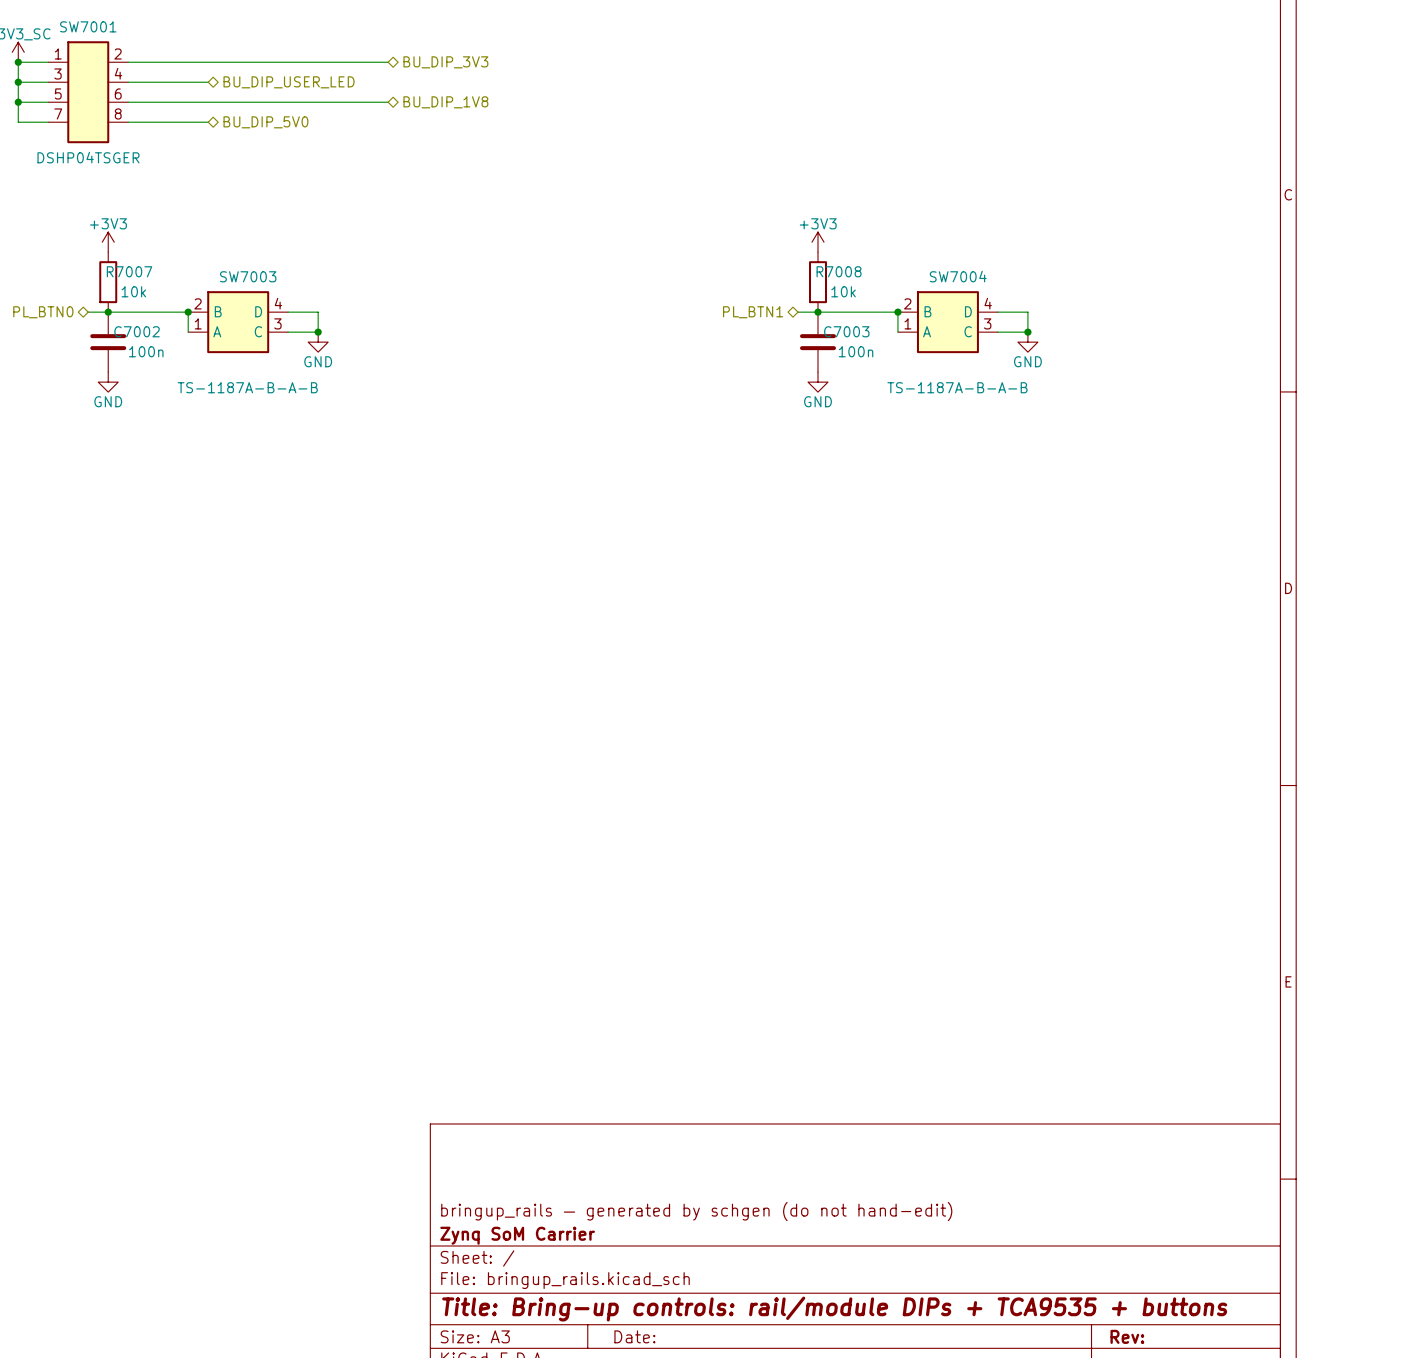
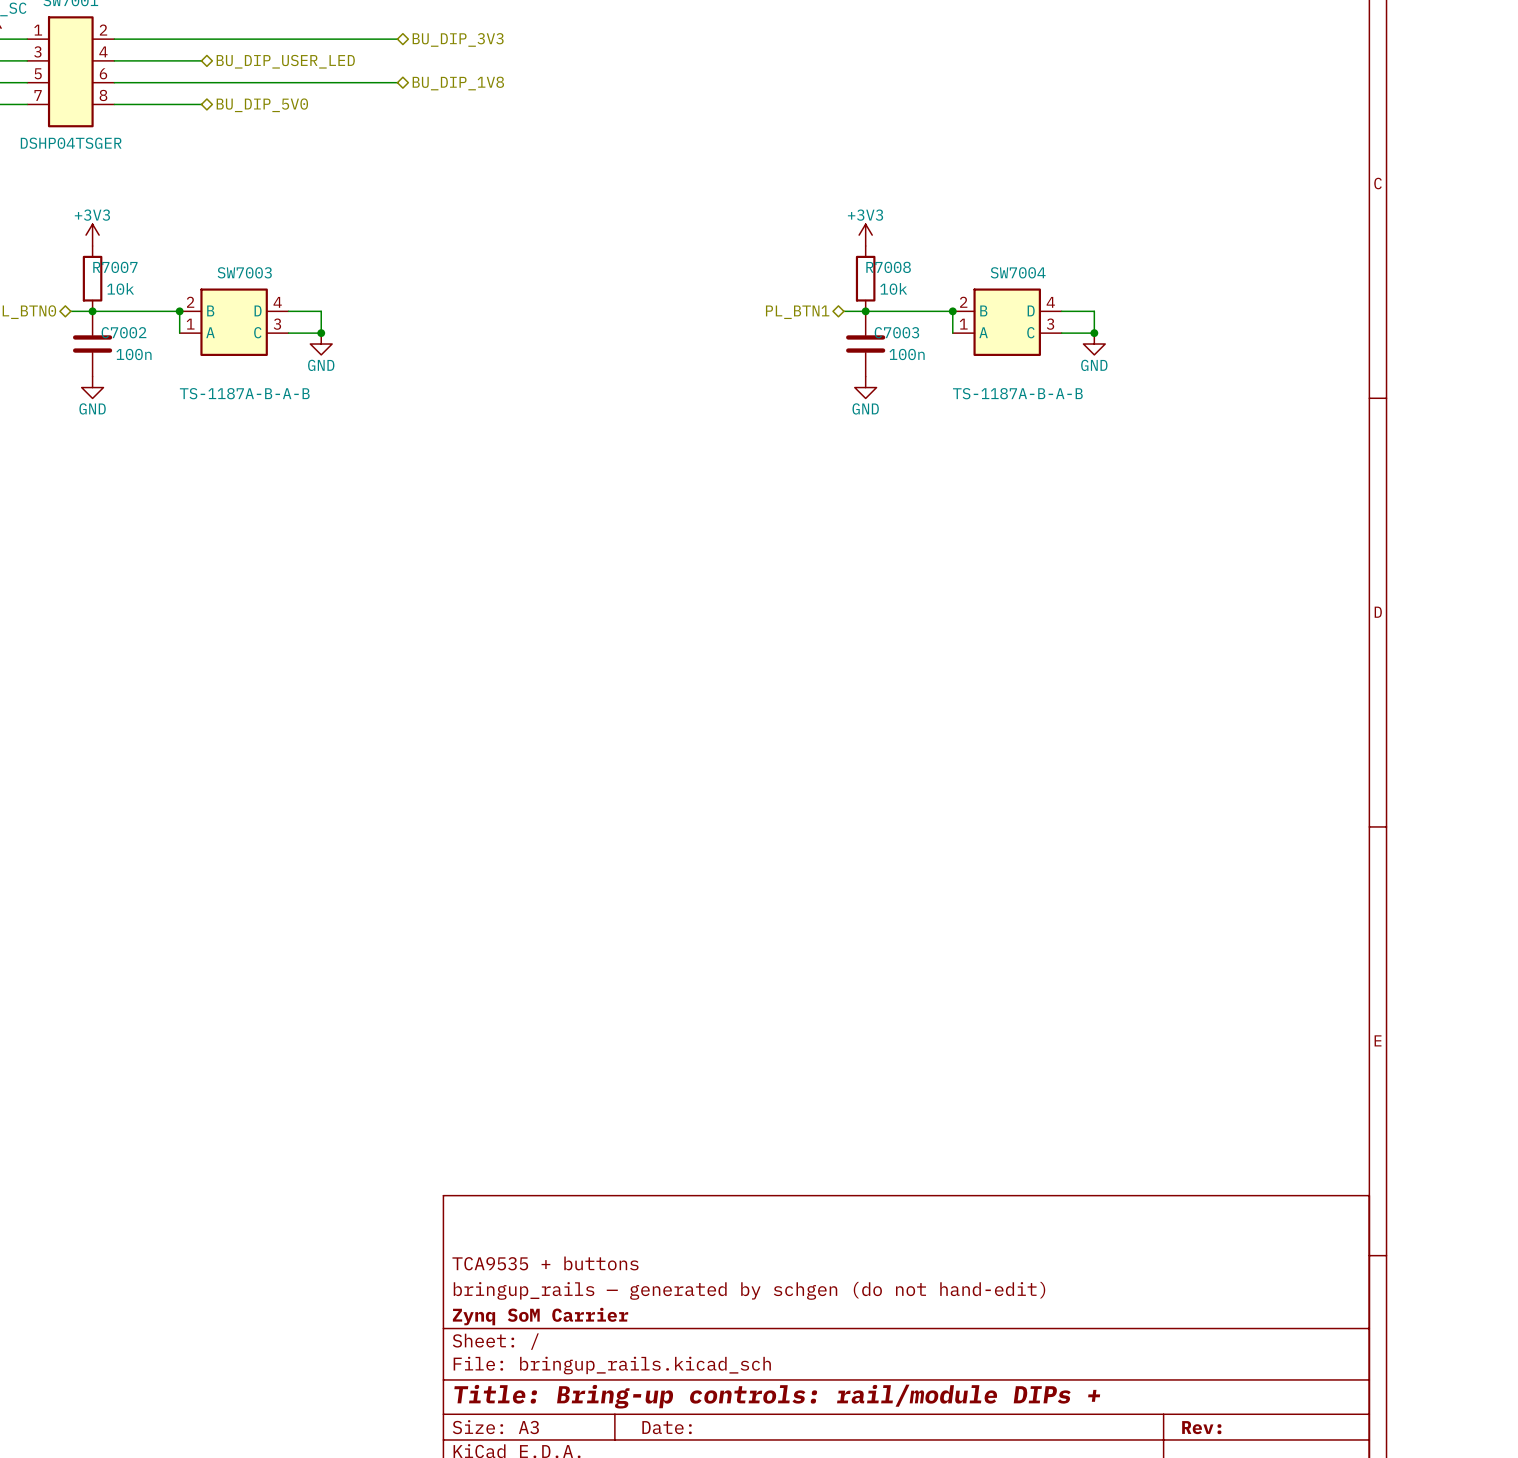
title block: none -> TCA9535 + buttons (545, 1263)
title block: Title: Bring-up controls: rail/module DIPs + TCA9535 + buttons (834, 1309) -> Title: Bring-up controls: rail/module DIPs + (777, 1396)

